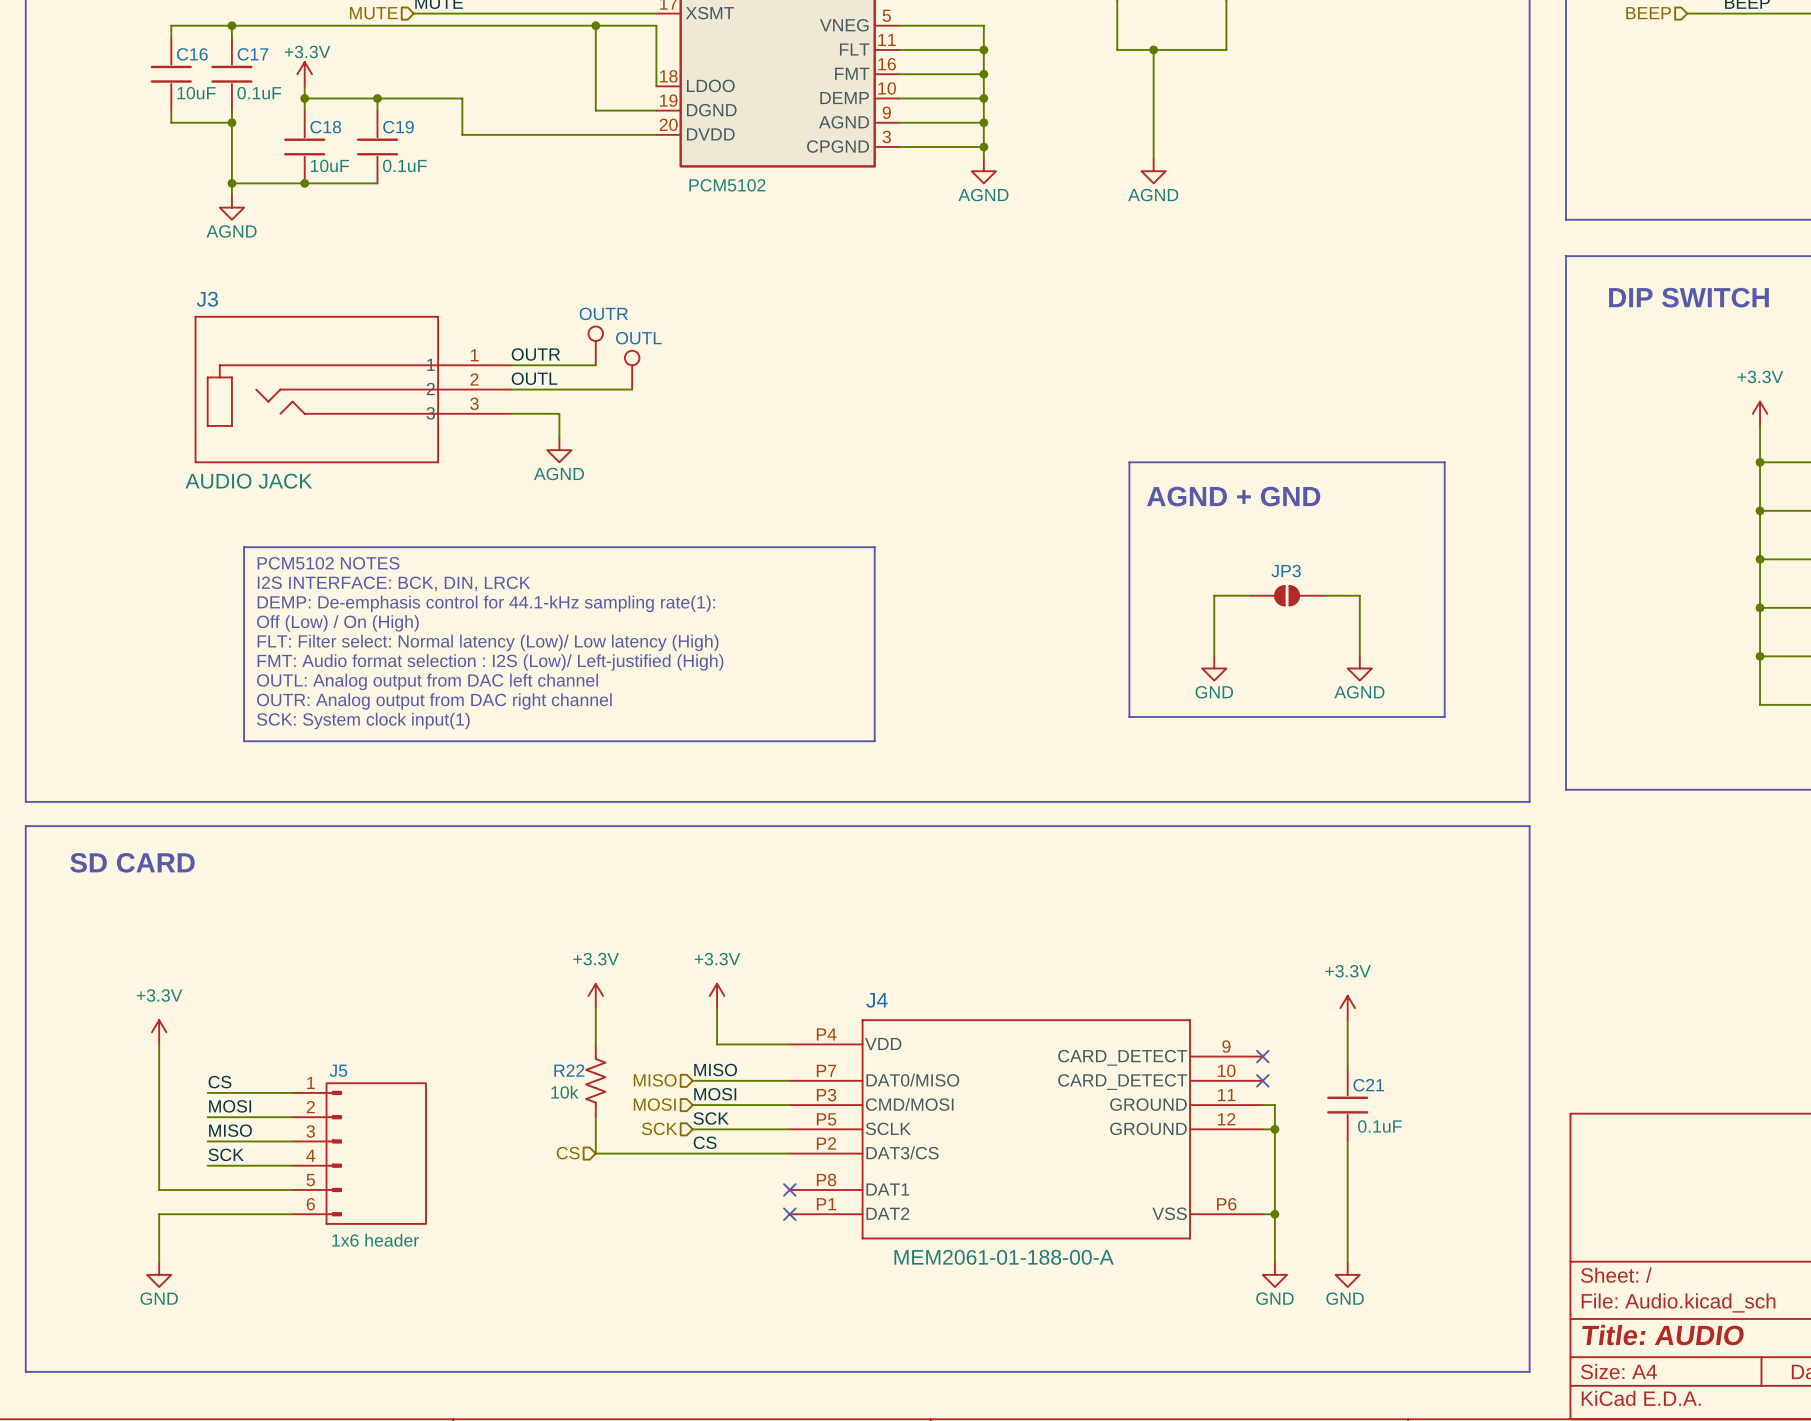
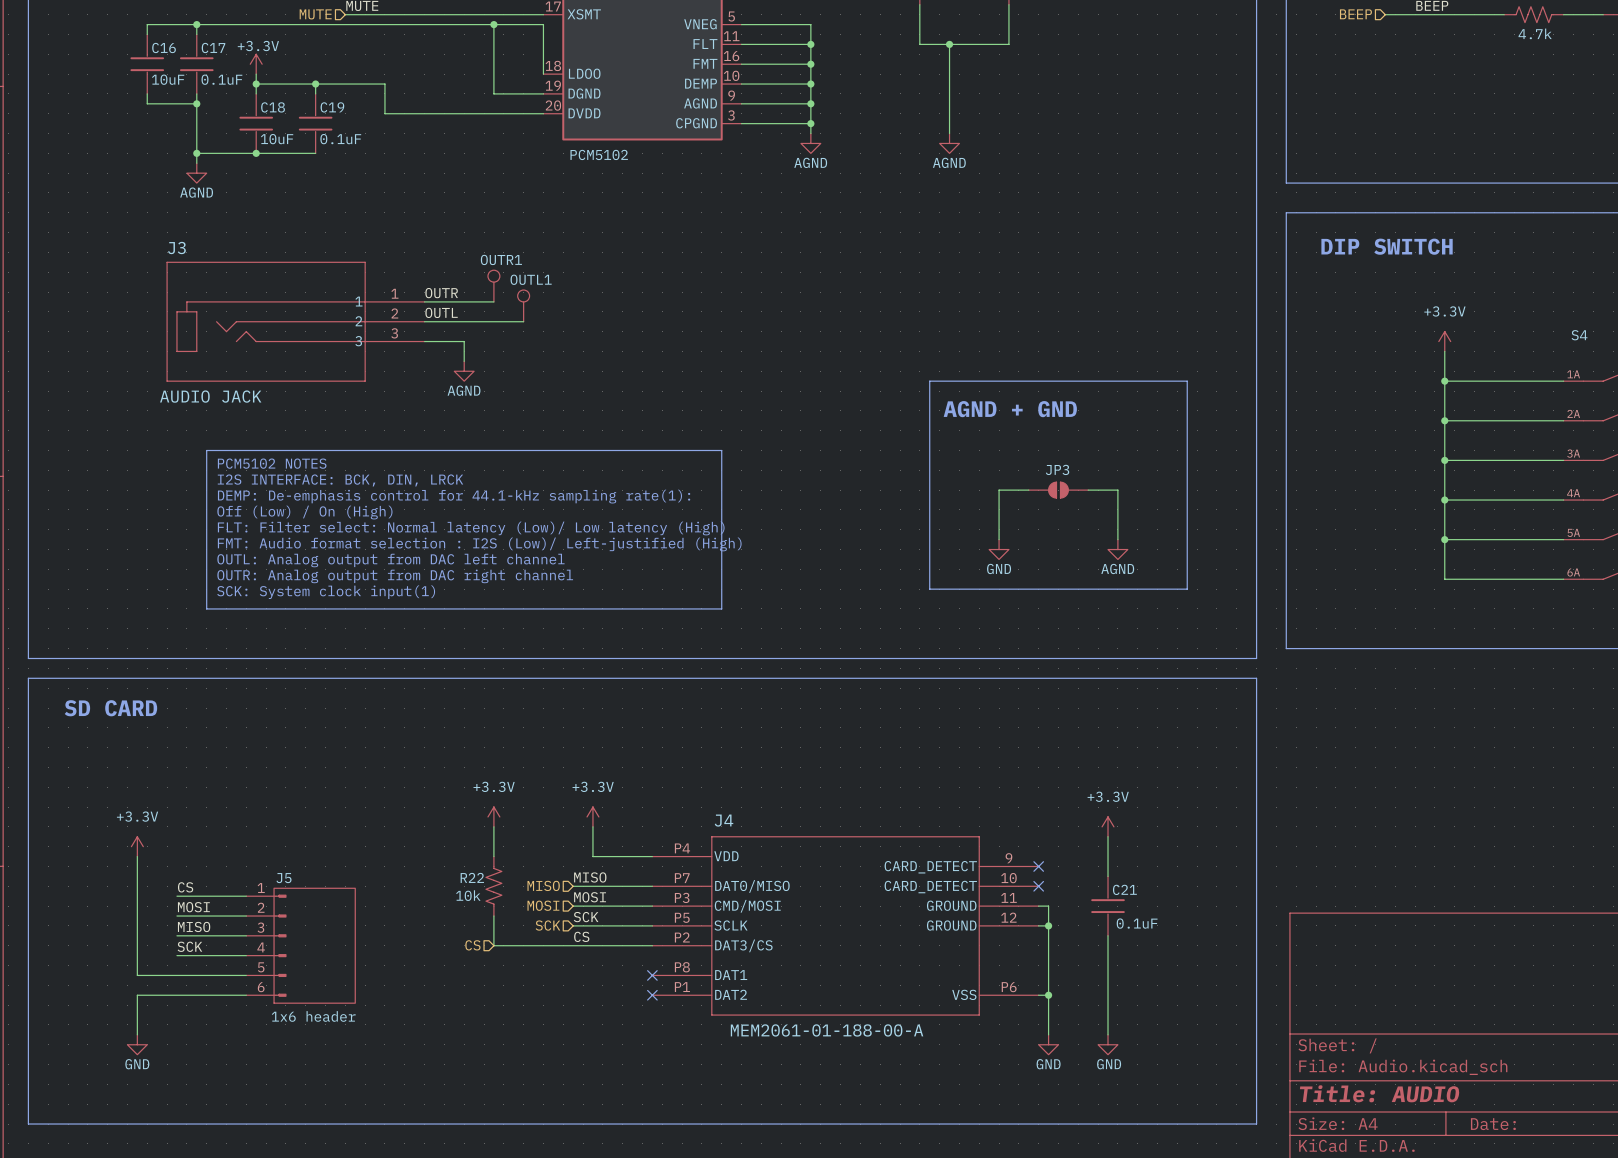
OUTR name: OUTR (603, 313) -> OUTR1 (501, 259)
OUTL name: OUTL (638, 338) -> OUTL1 (531, 279)

